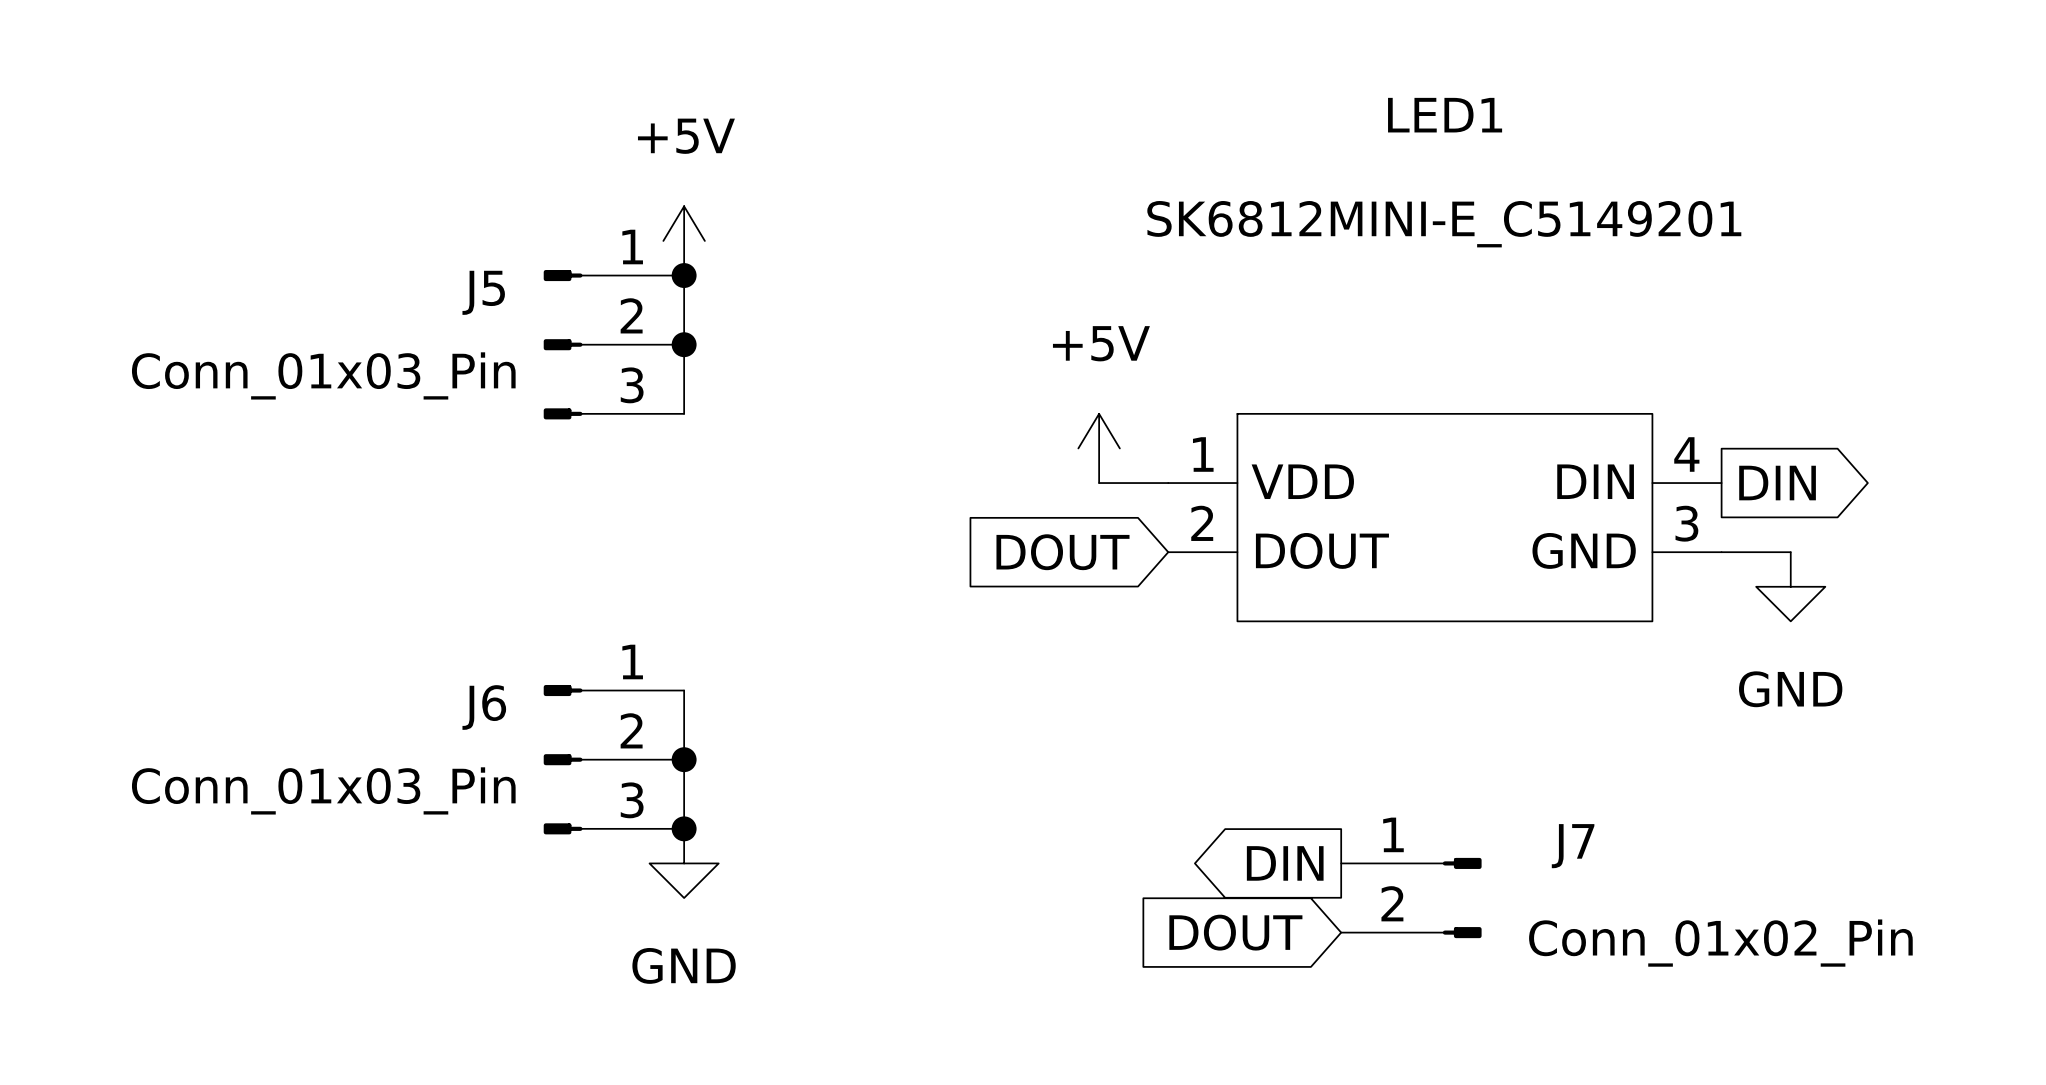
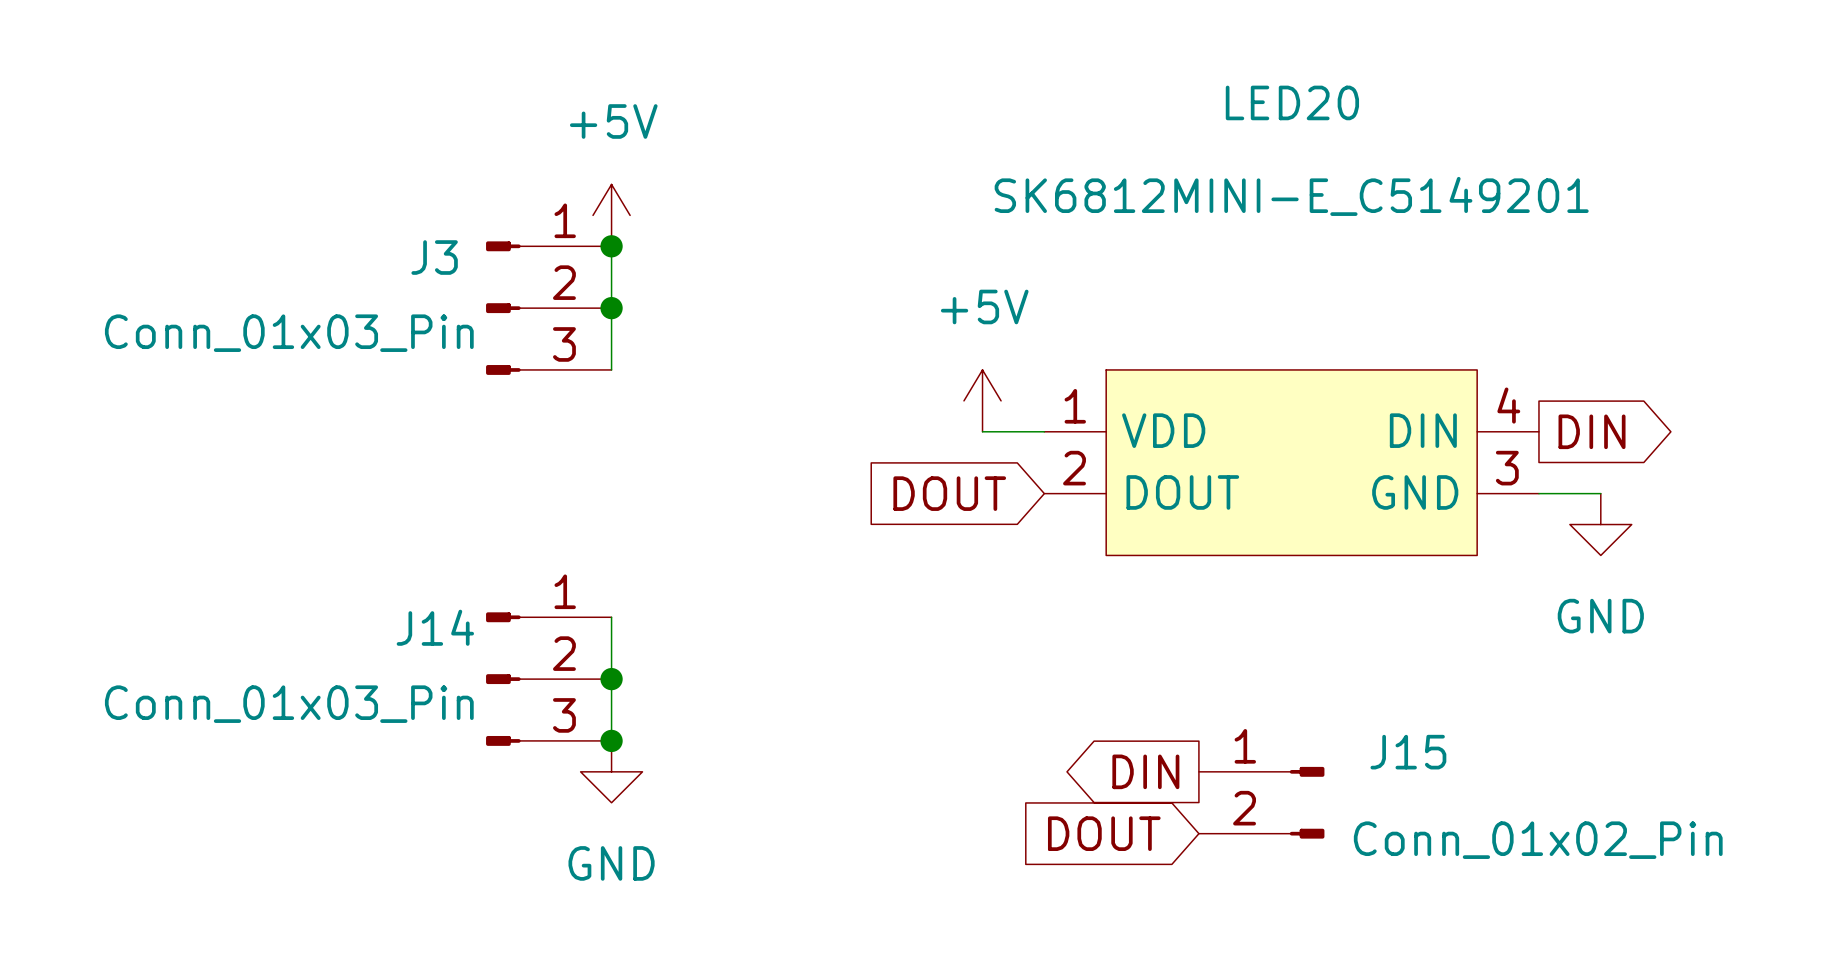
LED1 name: LED1 (1445, 115) -> LED20 (1292, 102)
J5 name: J5 (483, 292) -> J3 (434, 257)
J6 name: J6 (484, 707) -> J14 (435, 627)
J7 name: J7 (1573, 846) -> J15 (1408, 752)

